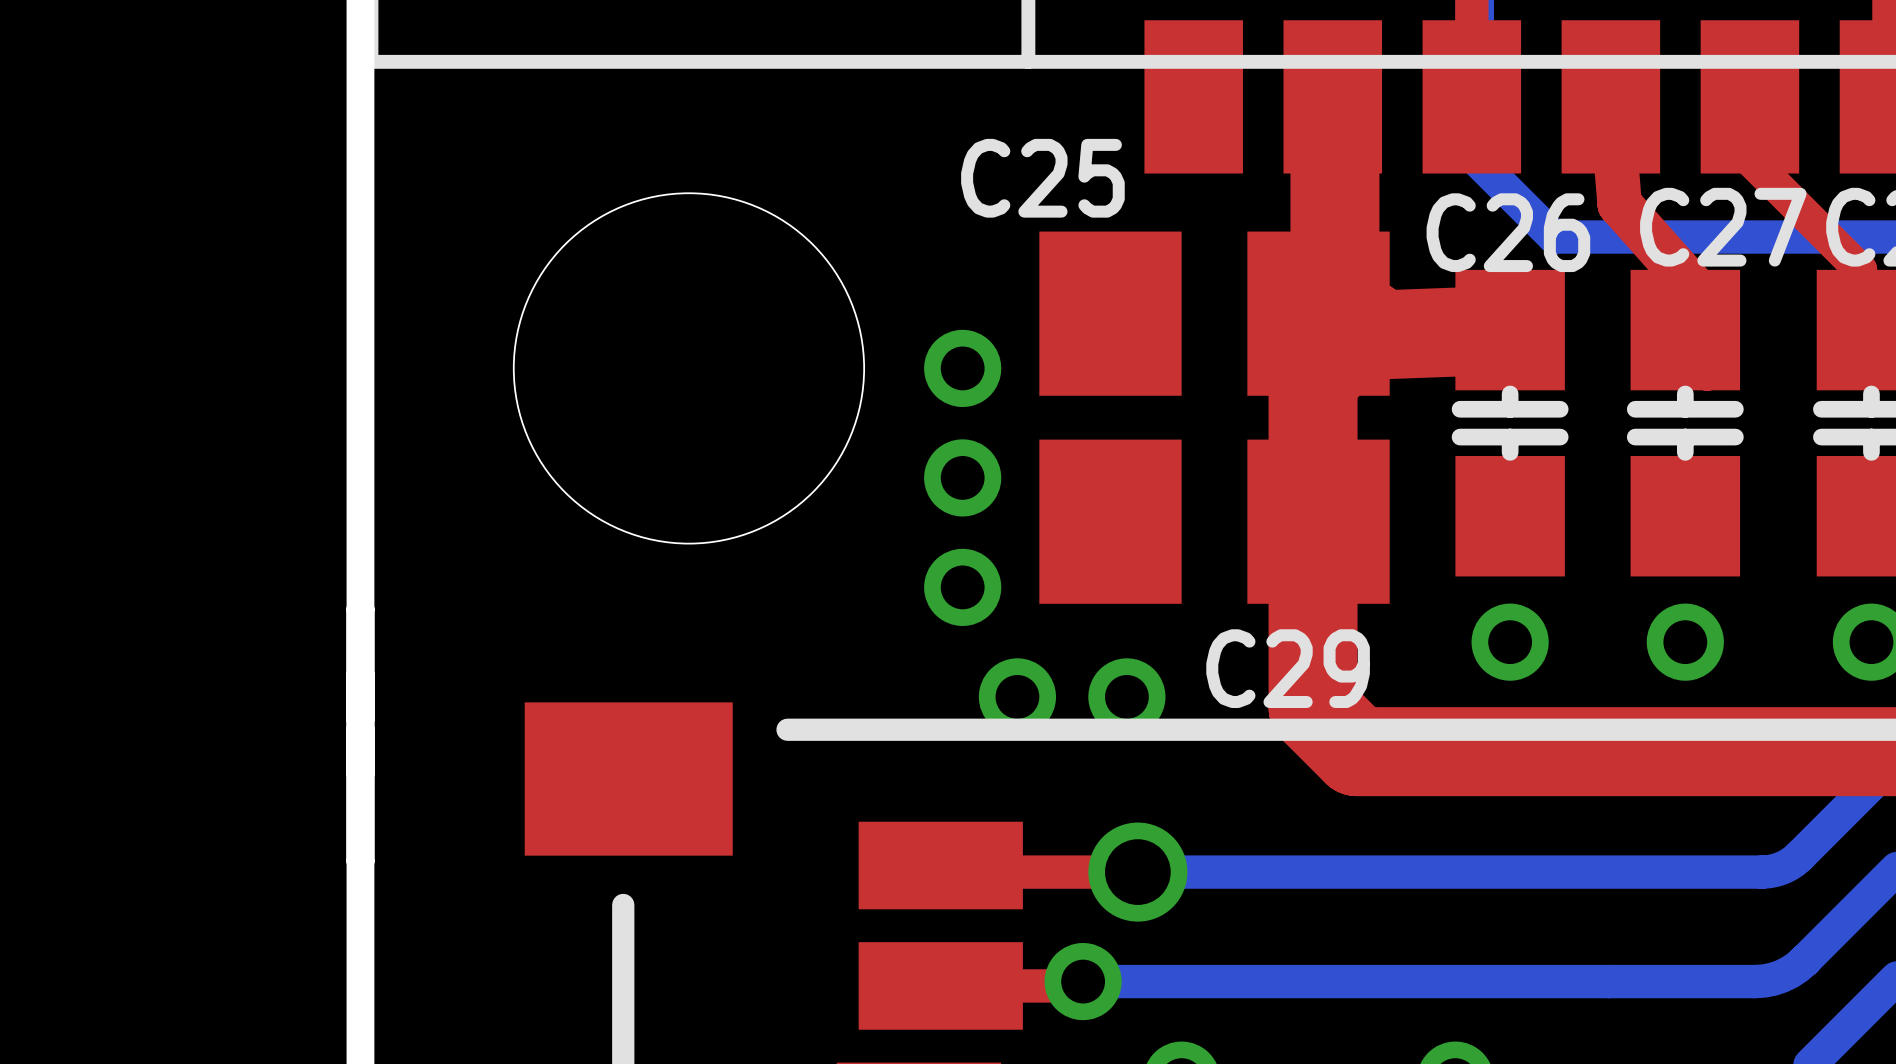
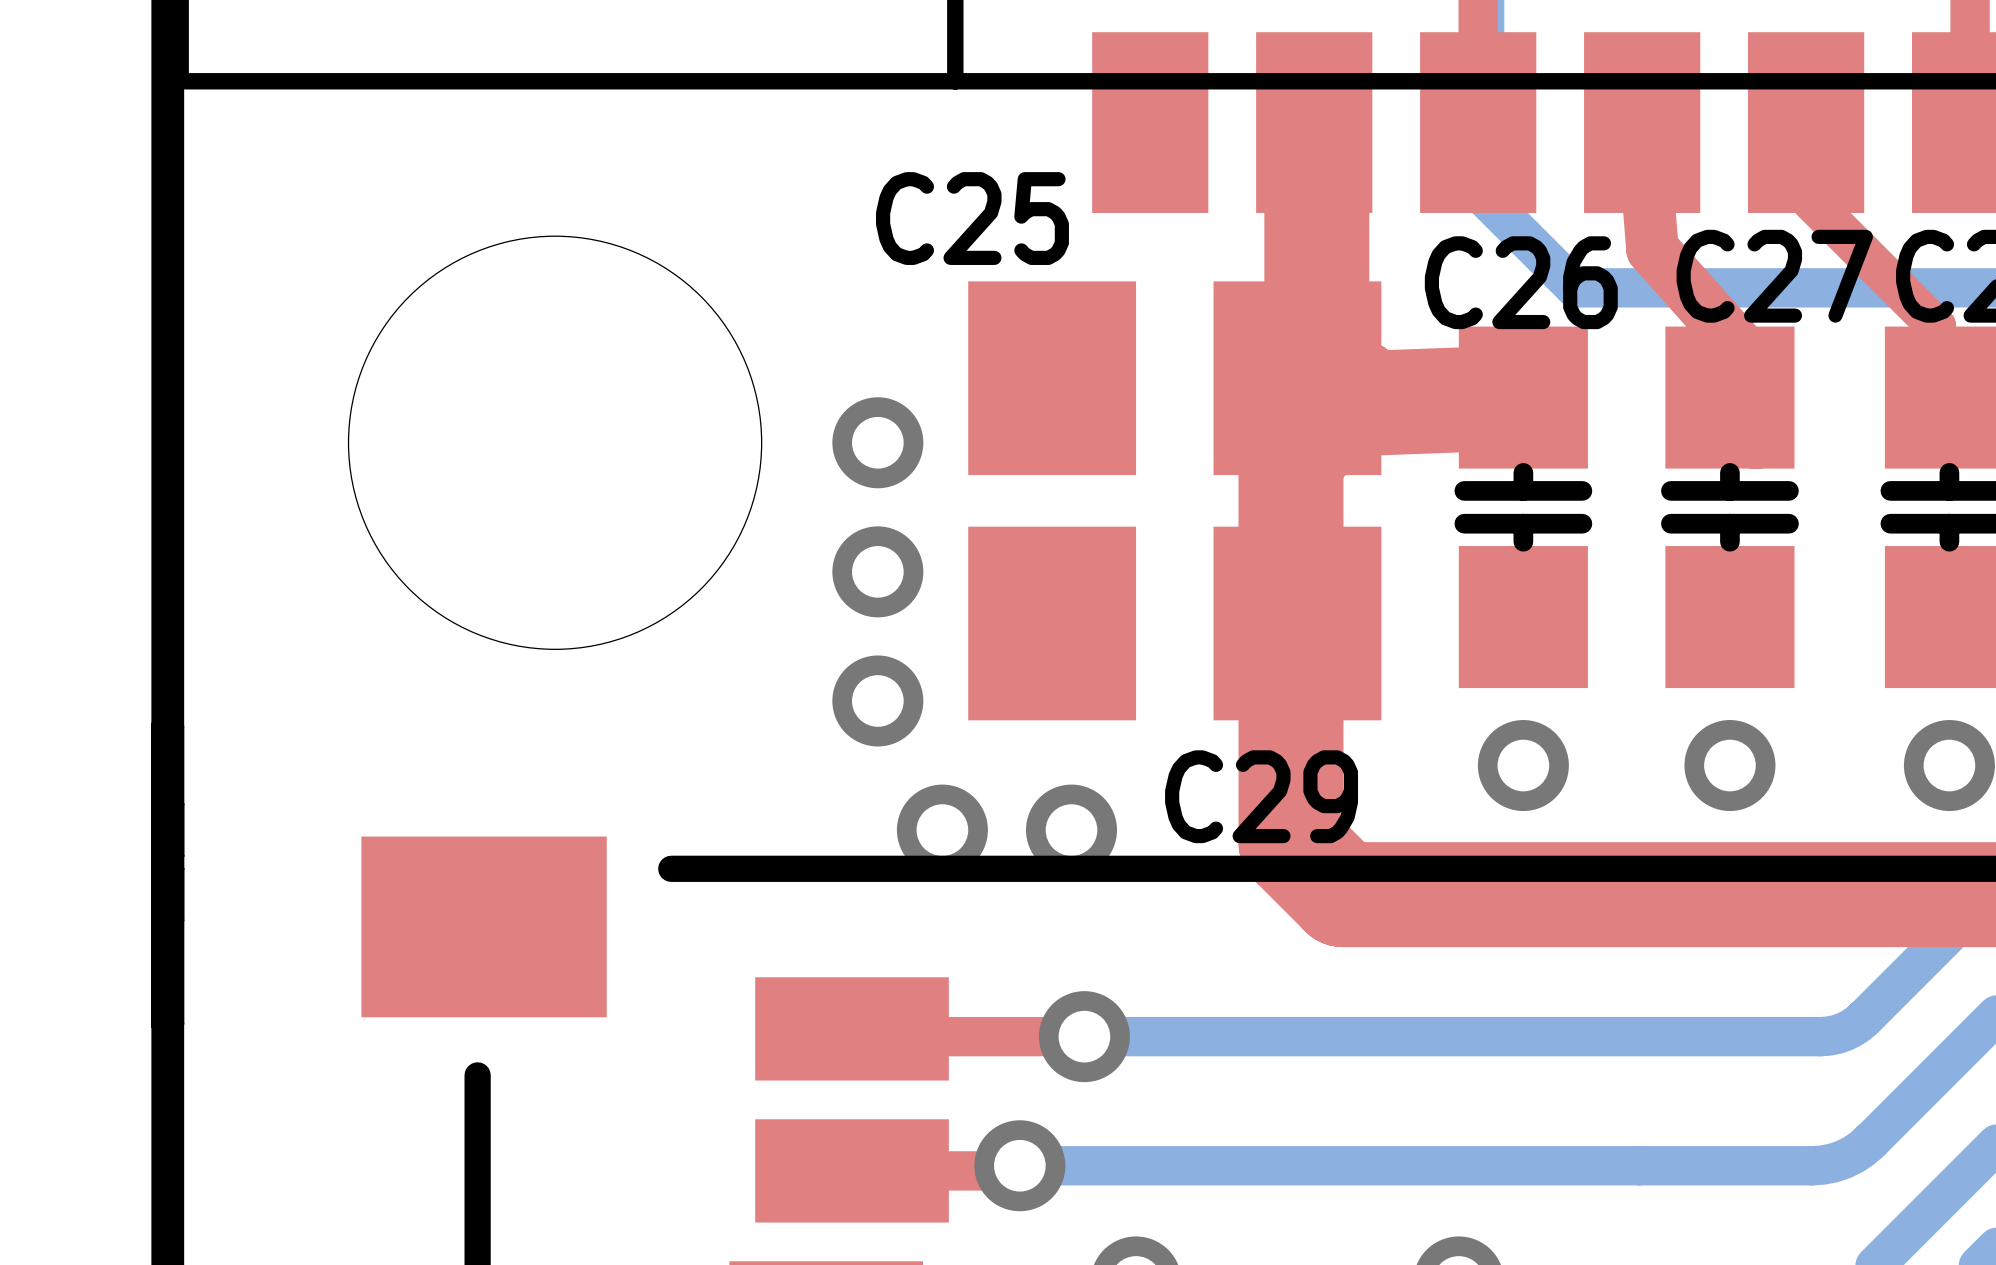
via size: [1088, 822, 1188, 922] -> [1038, 991, 1130, 1083]

